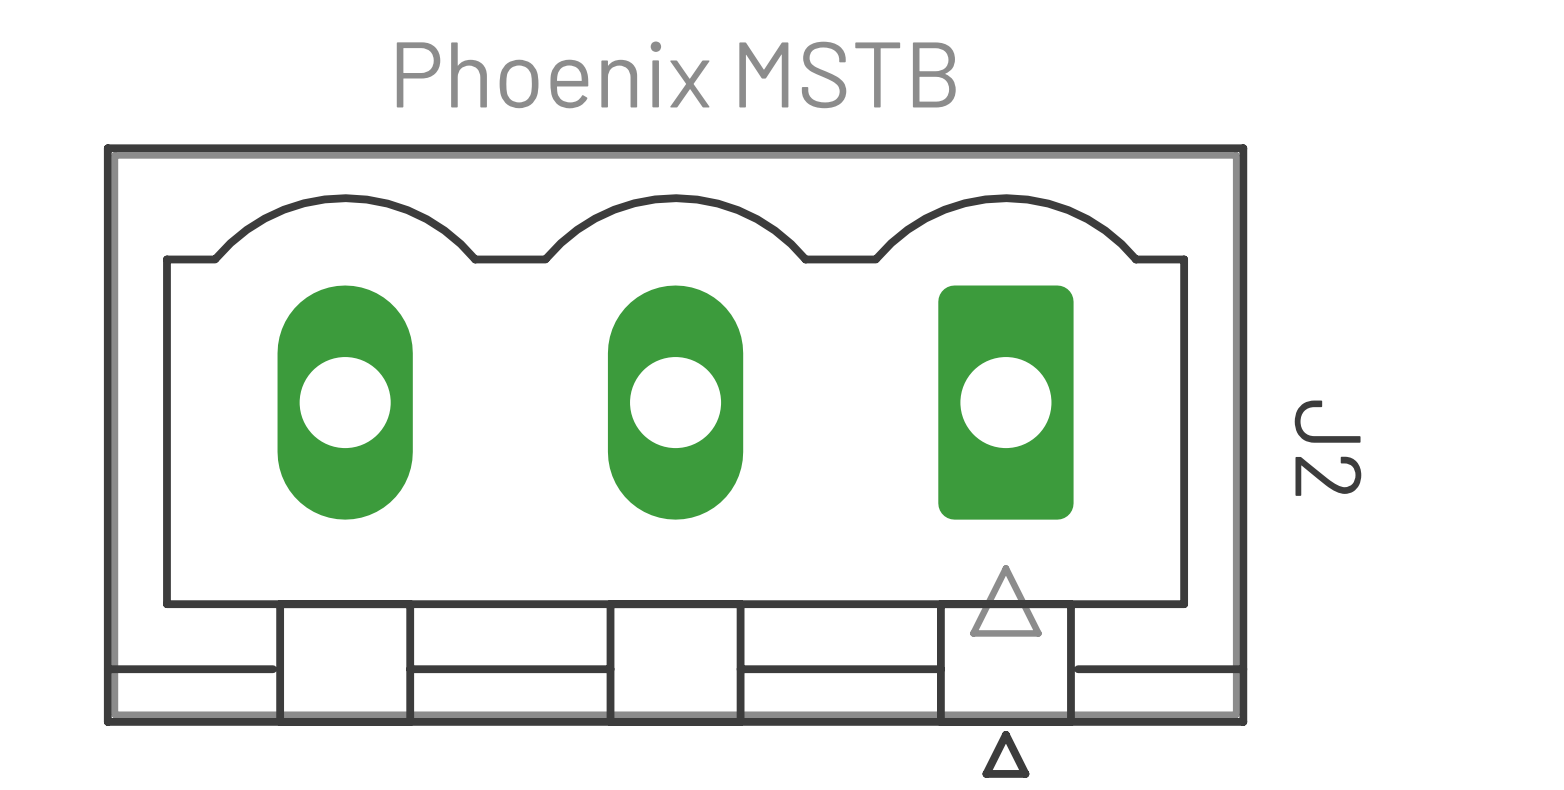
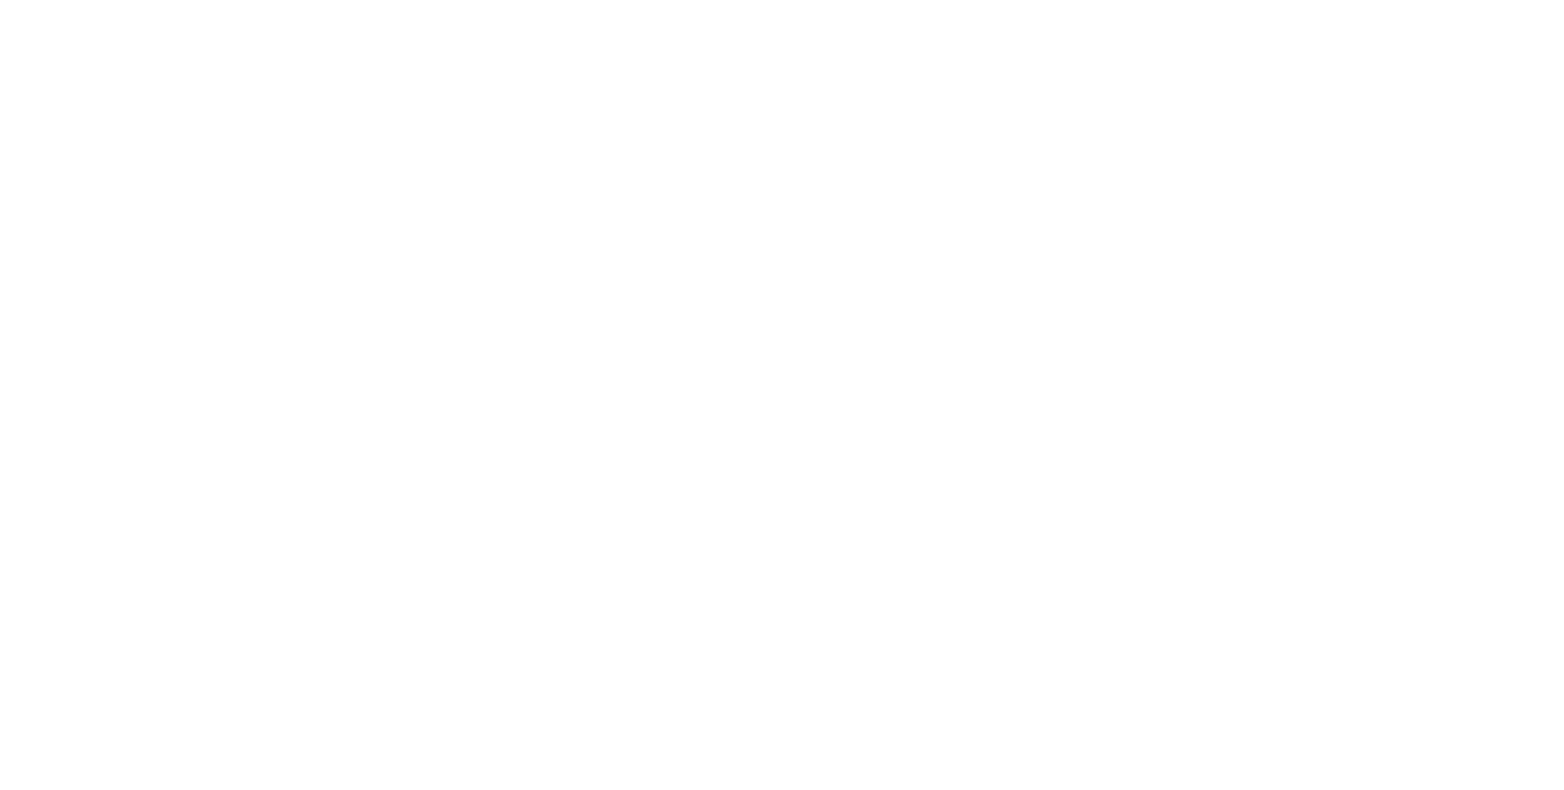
J2: Phoenix MSTB (675, 461) -> none

